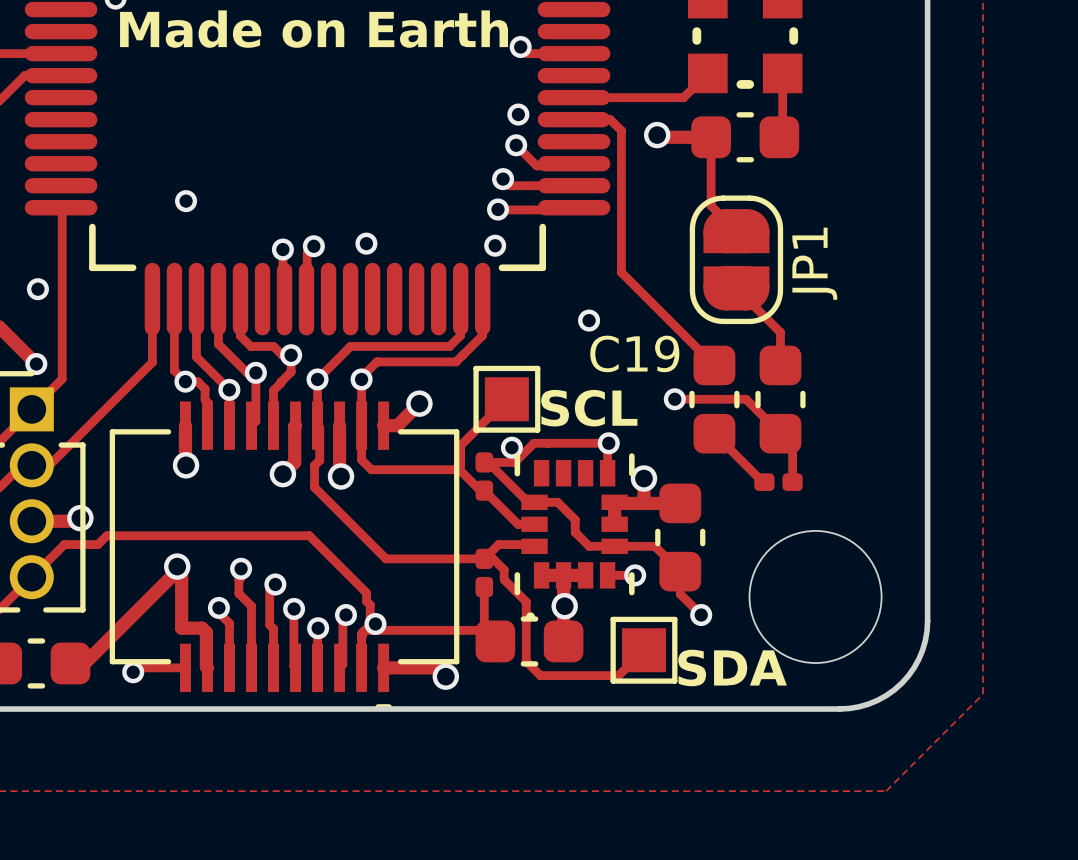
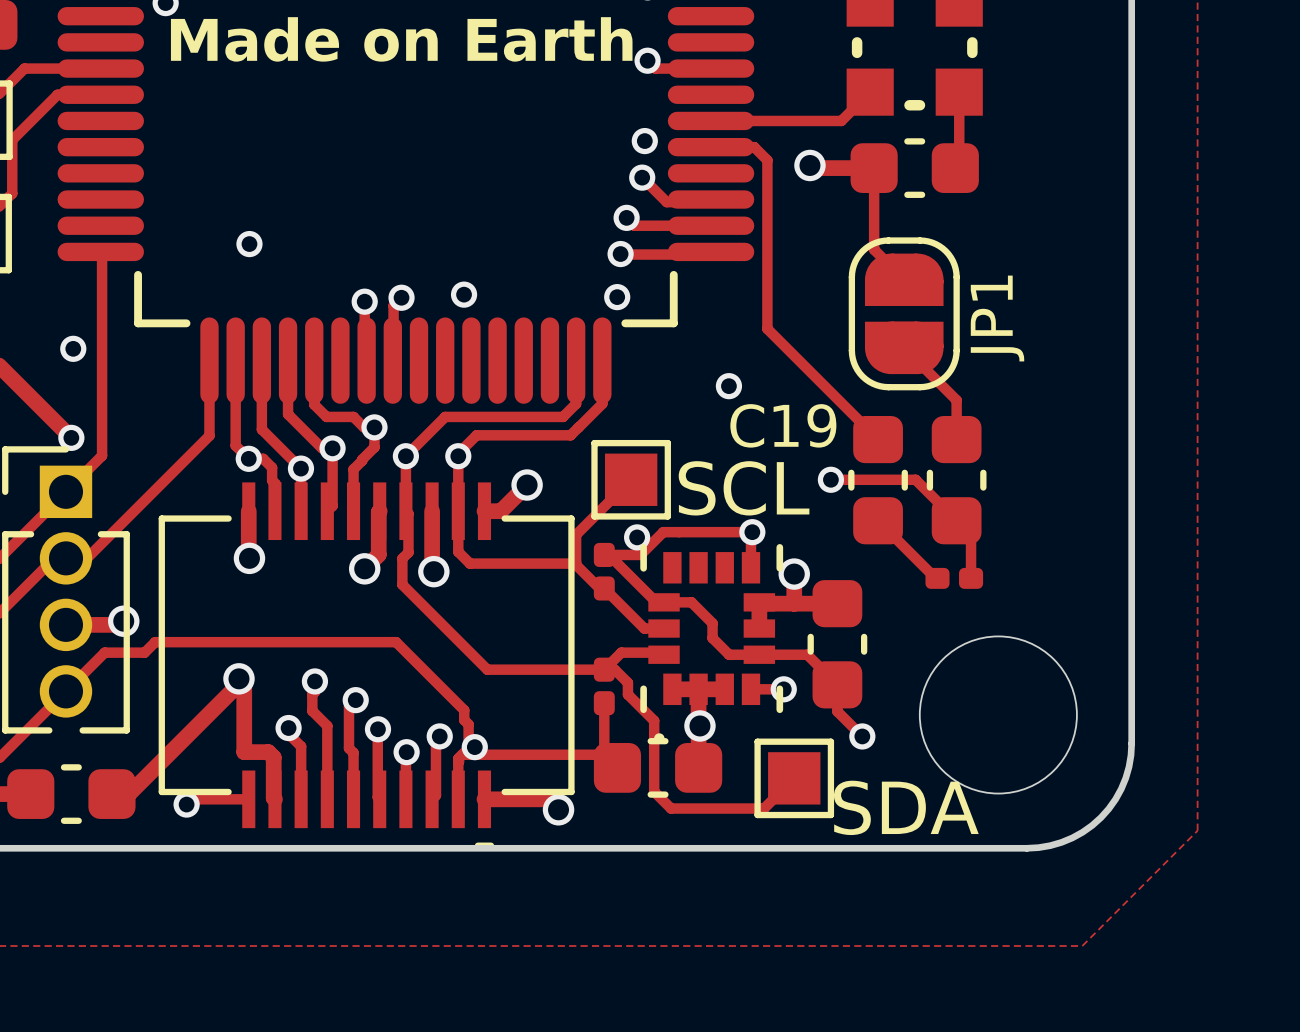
SCL name: none -> SCL (744, 488)
text: SCL (589, 408) -> none
text: SDA (732, 667) -> none
SDA name: none -> SDA (906, 807)

